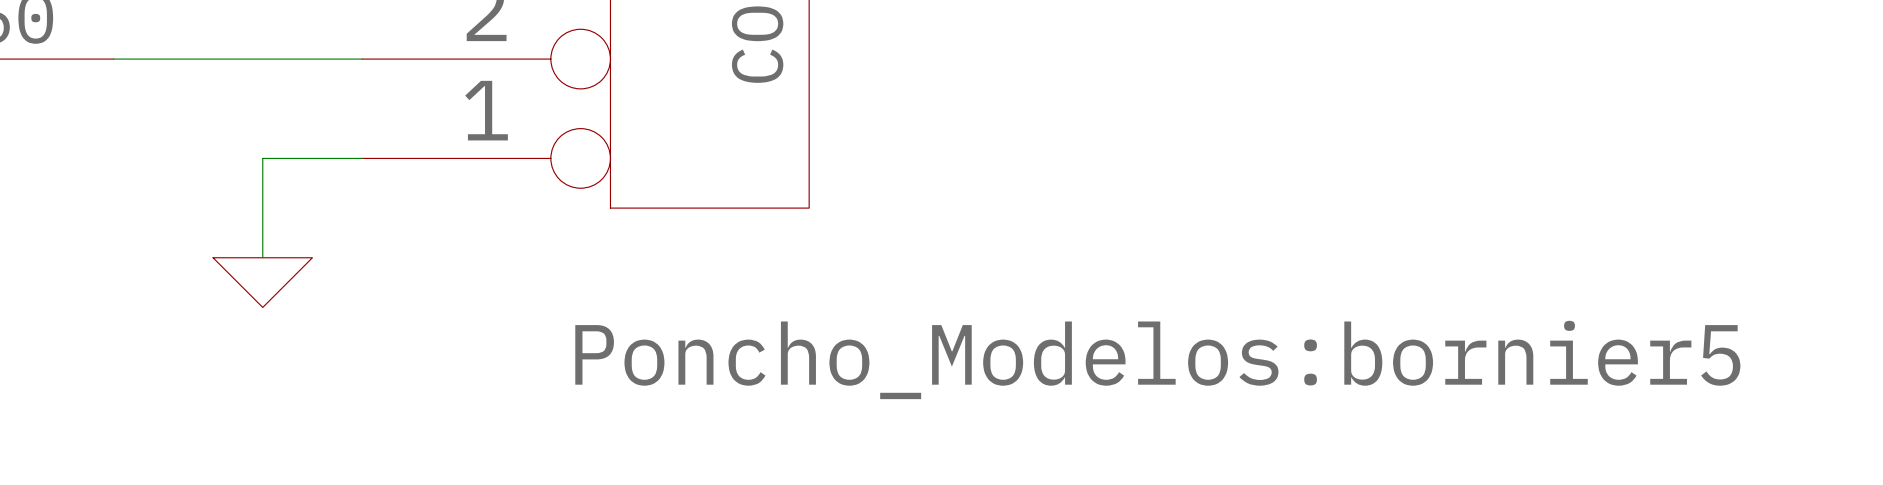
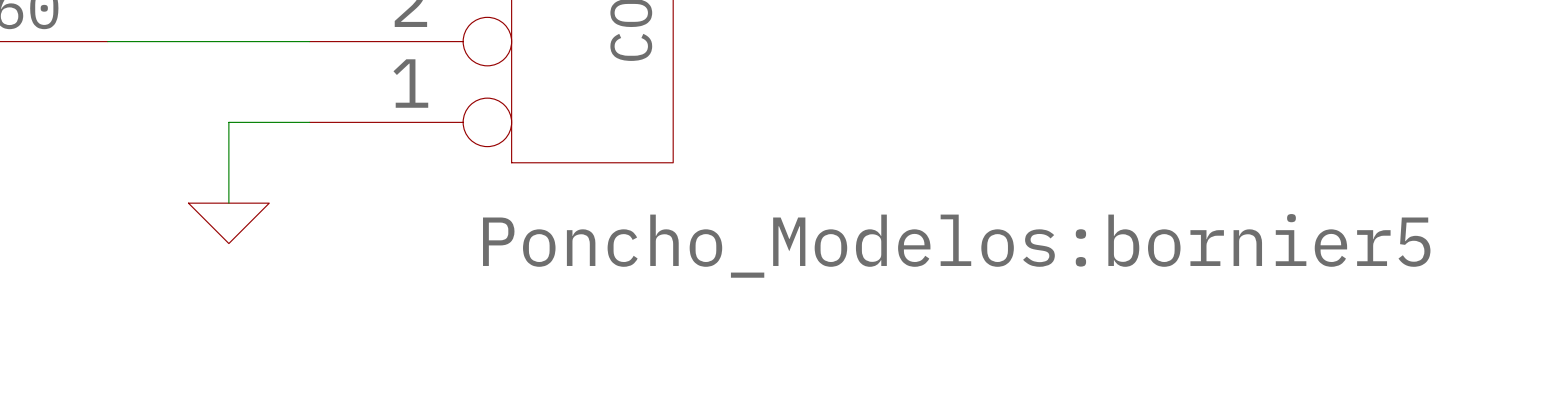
part text position: Poncho_Modelos:bornier5 (1157, 359) -> Poncho_Modelos:bornier5 (956, 245)

